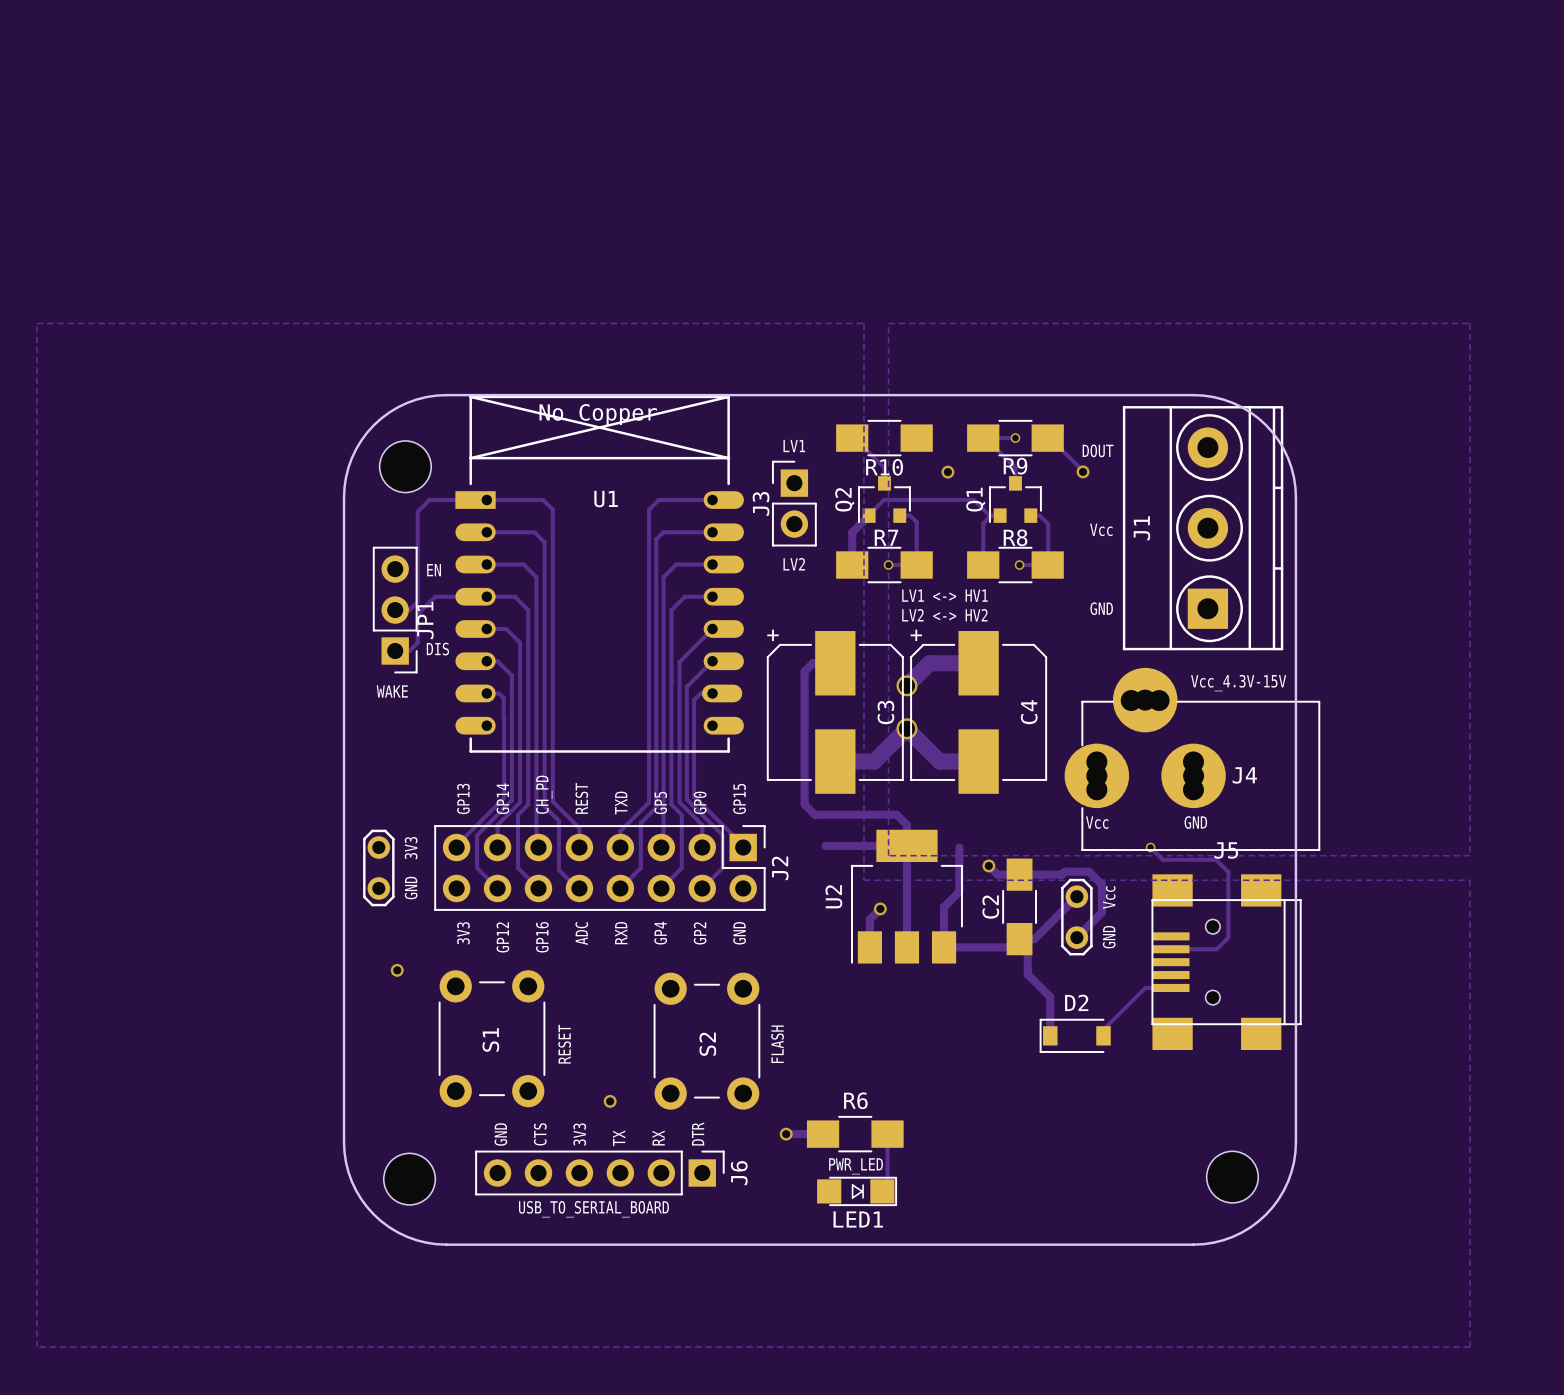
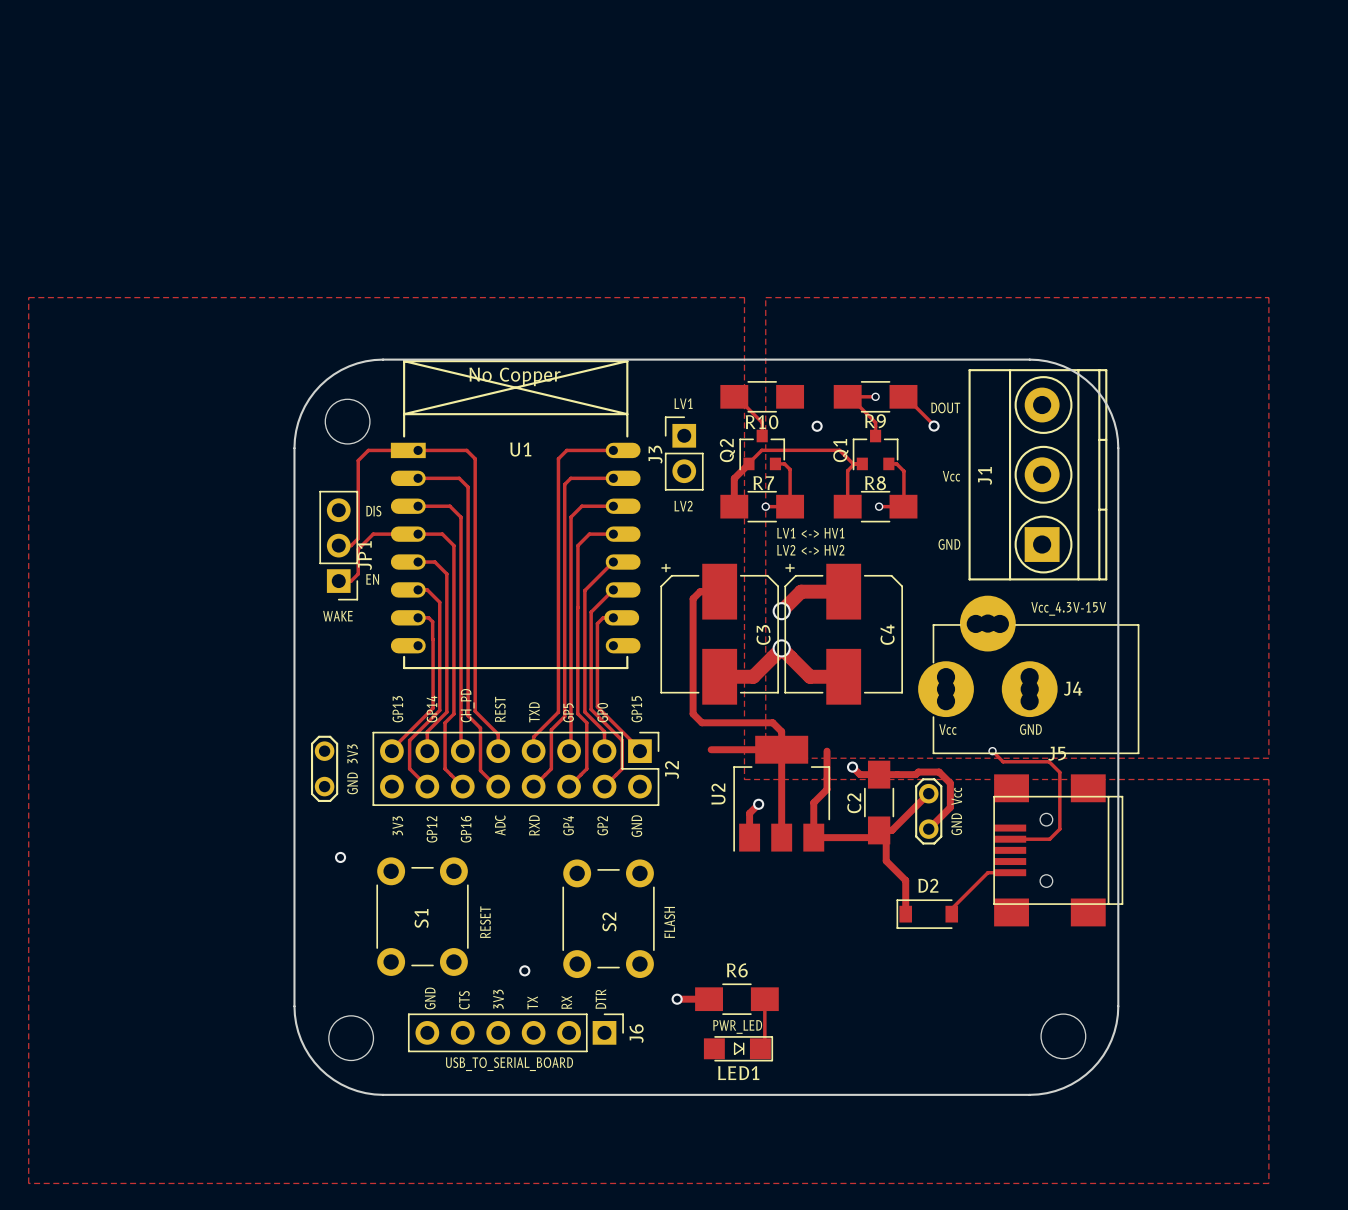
text: EN (434, 570) -> DIS (373, 511)
text: DIS (437, 649) -> EN (372, 579)

